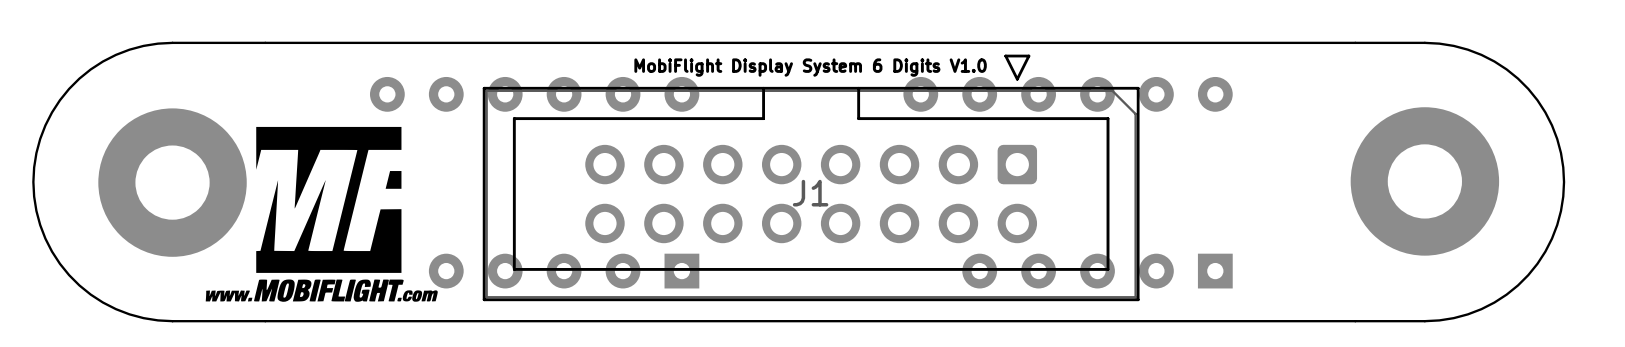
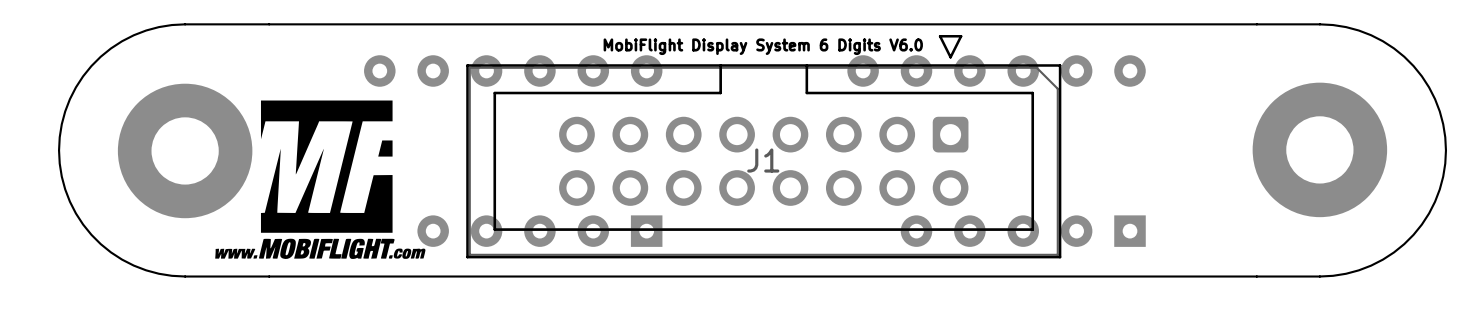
text: MobiFlight Display System 6 Digits V1.0 (810, 67) -> MobiFlight Display System 6 Digits V6.0 (763, 46)

